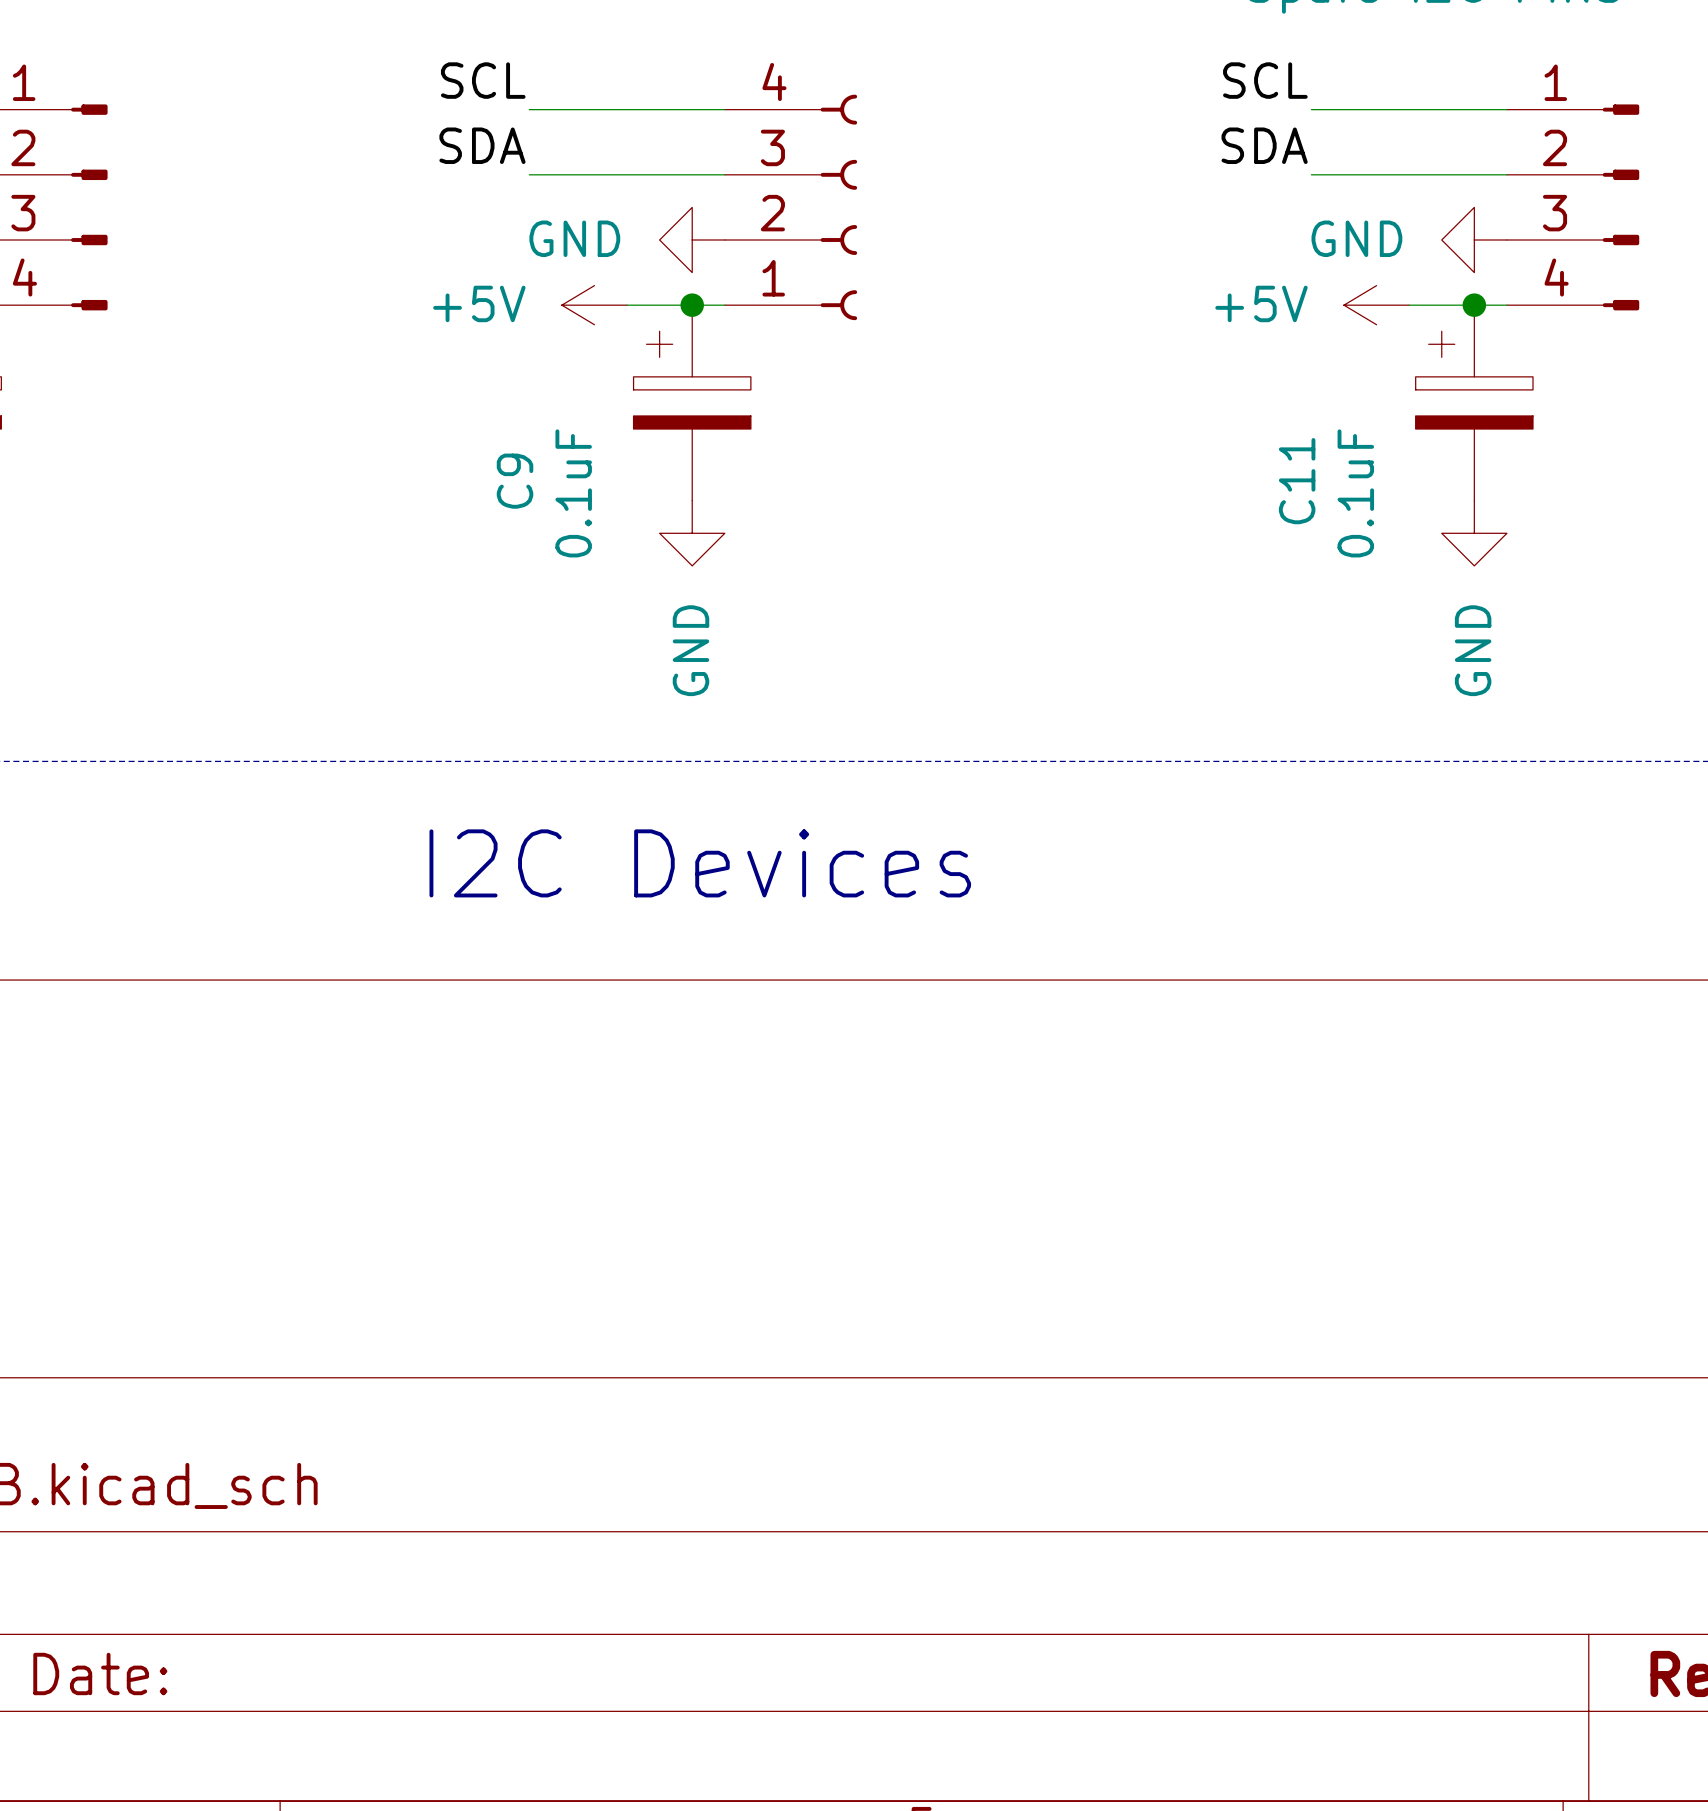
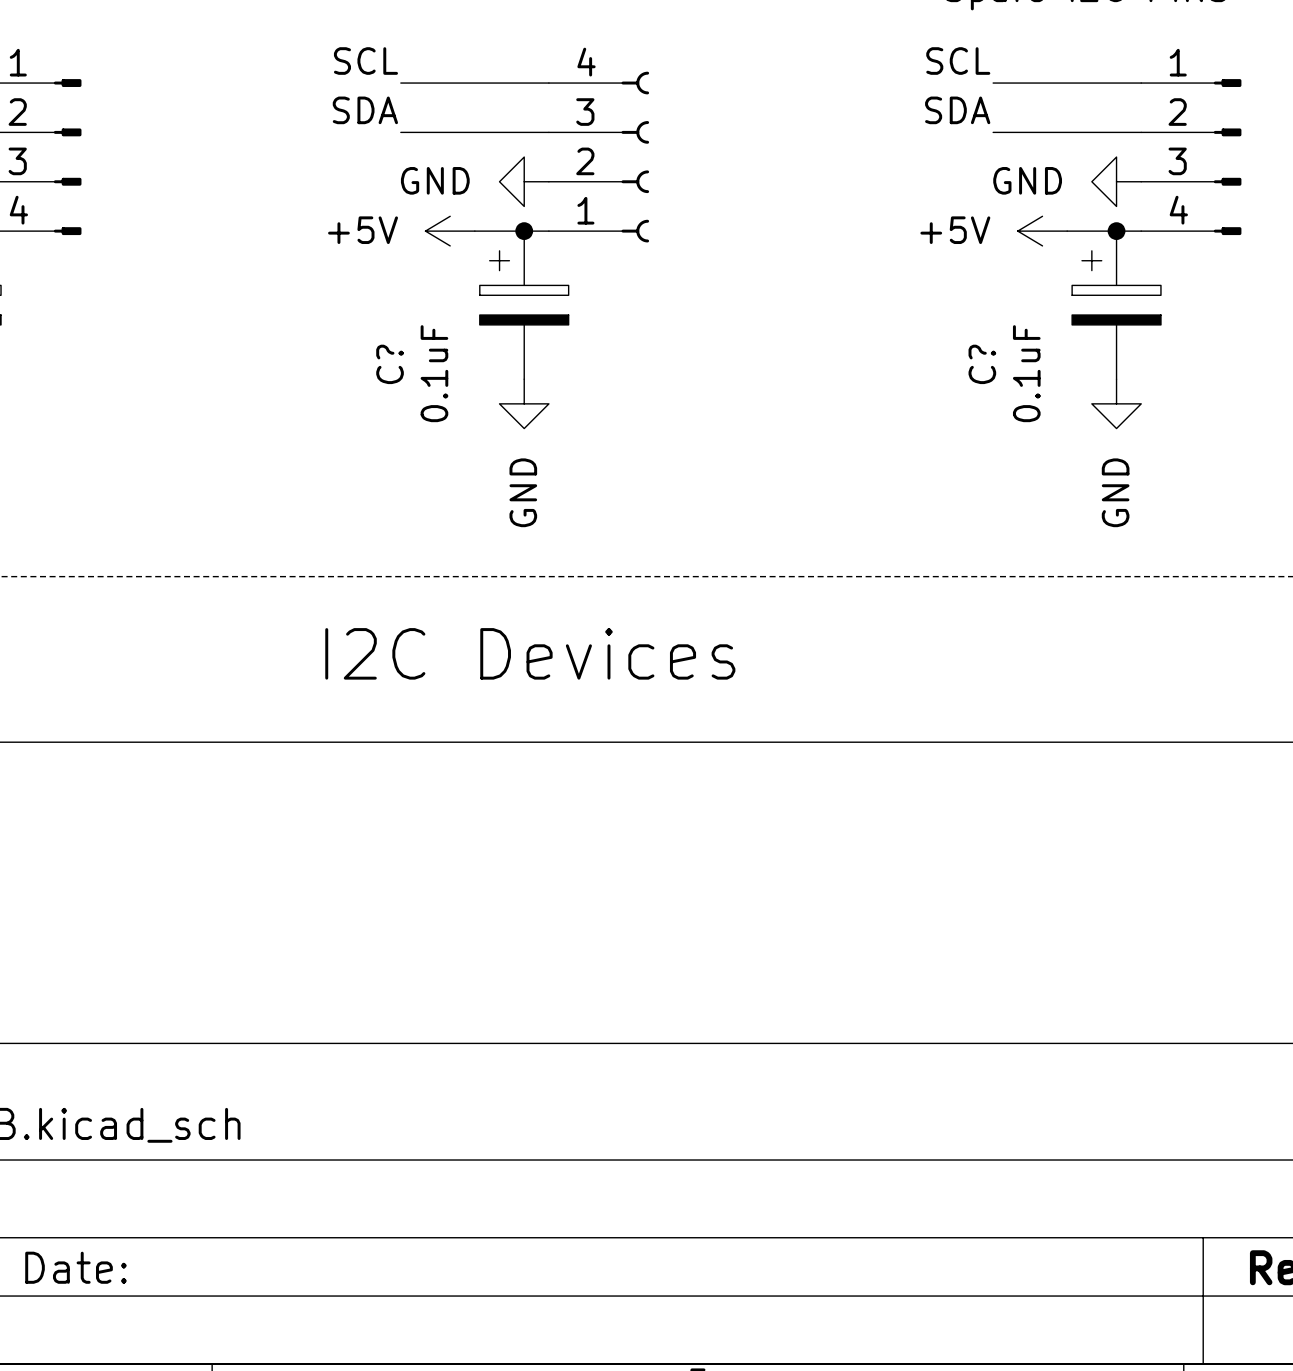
C9 name: C9 (515, 481) -> C? (390, 364)
C11 name: C11 (1297, 481) -> C? (982, 364)

